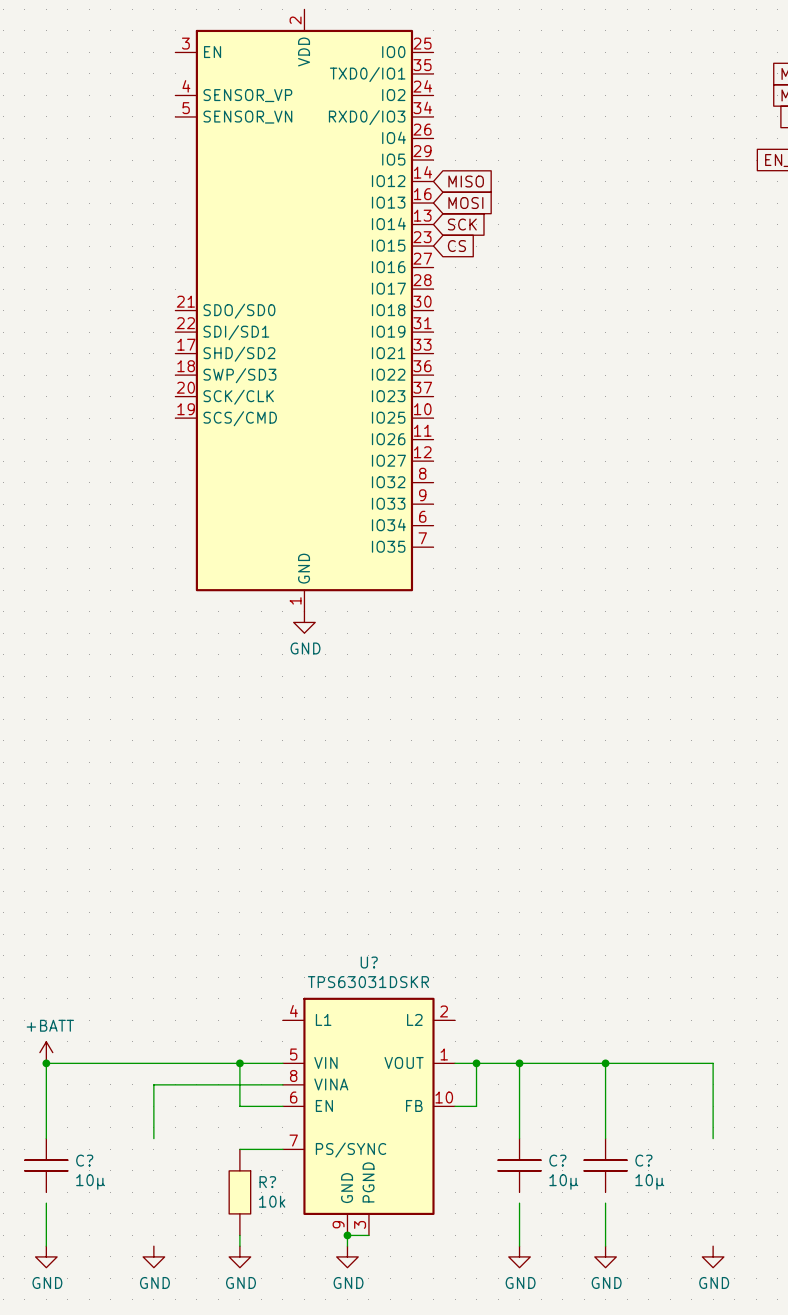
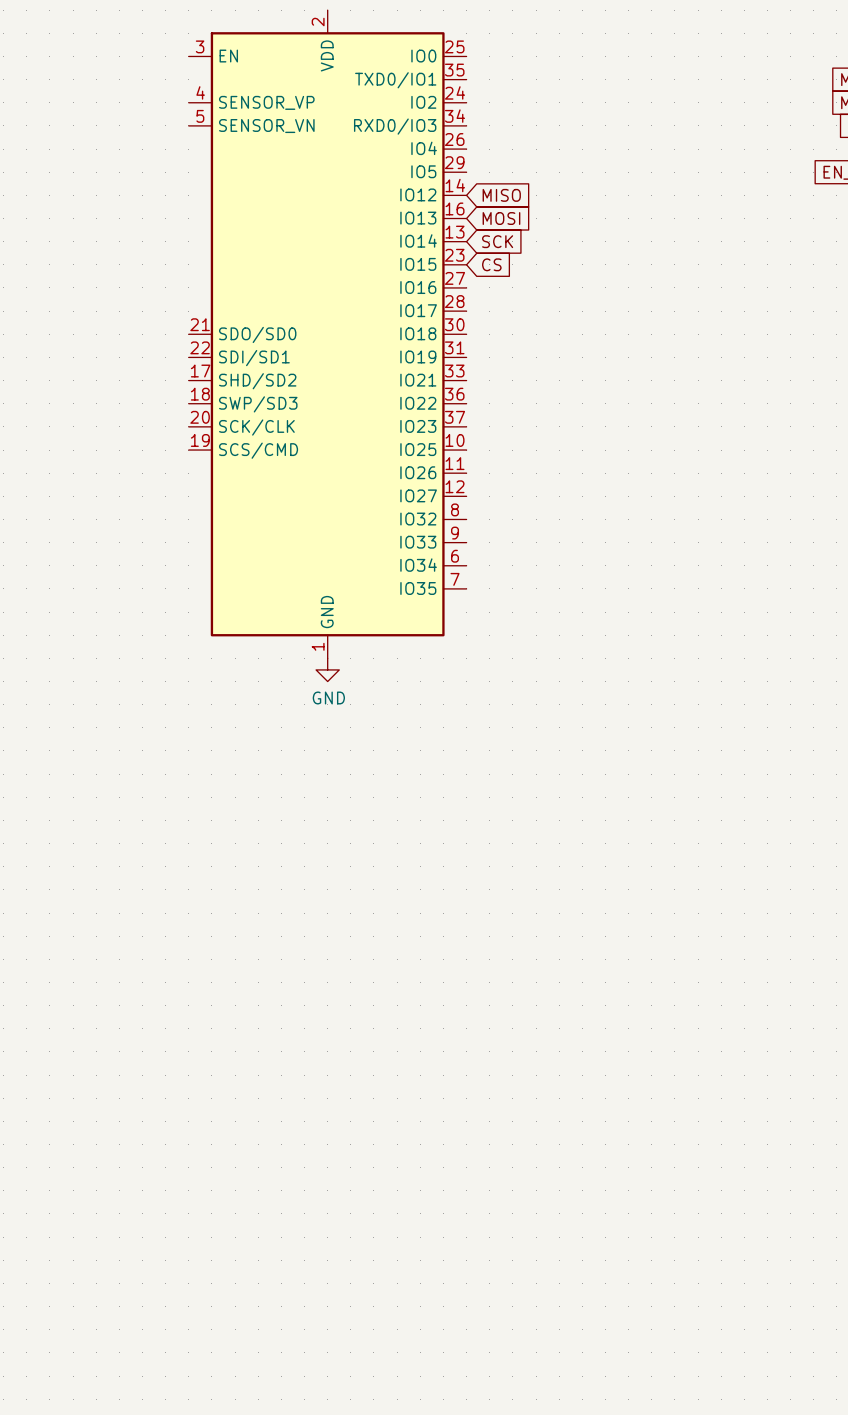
power symbol: +BATT (46, 1052) -> none
junction: (46, 1063) -> none
wire: (239, 1063) (239, 1106) (282, 1106) -> none
junction: (239, 1063) -> none
wire: (282, 1063) (46, 1063) (46, 1138) -> none
wire: (455, 1063) (713, 1063) (713, 1138) -> none
wire: (476, 1063) (476, 1106) (455, 1106) -> none
junction: (476, 1063) -> none
wire: (519, 1063) (519, 1138) -> none
junction: (519, 1063) -> none
wire: (605, 1063) (605, 1138) -> none
junction: (605, 1063) -> none
wire: (282, 1084) (153, 1084) (153, 1138) -> none
U?: TPS63031DSKR (368, 1116) -> none
wire: (239, 1149) (282, 1149) -> none
C?: 10µ (46, 1165) -> none
C?: 10µ (519, 1165) -> none
C?: 10µ (605, 1165) -> none
R?: 10k (239, 1192) -> none
wire: (46, 1203) (46, 1246) -> none
wire: (519, 1203) (519, 1246) -> none
wire: (605, 1203) (605, 1246) -> none
wire: (239, 1235) (239, 1246) -> none
junction: (347, 1235) -> none
wire: (368, 1235) (347, 1235) (347, 1246) -> none
power symbol: GND (46, 1256) -> none
power symbol: GND (153, 1256) -> none
power symbol: GND (239, 1256) -> none
power symbol: GND (347, 1256) -> none
power symbol: GND (519, 1256) -> none
power symbol: GND (605, 1256) -> none
power symbol: GND (713, 1256) -> none

